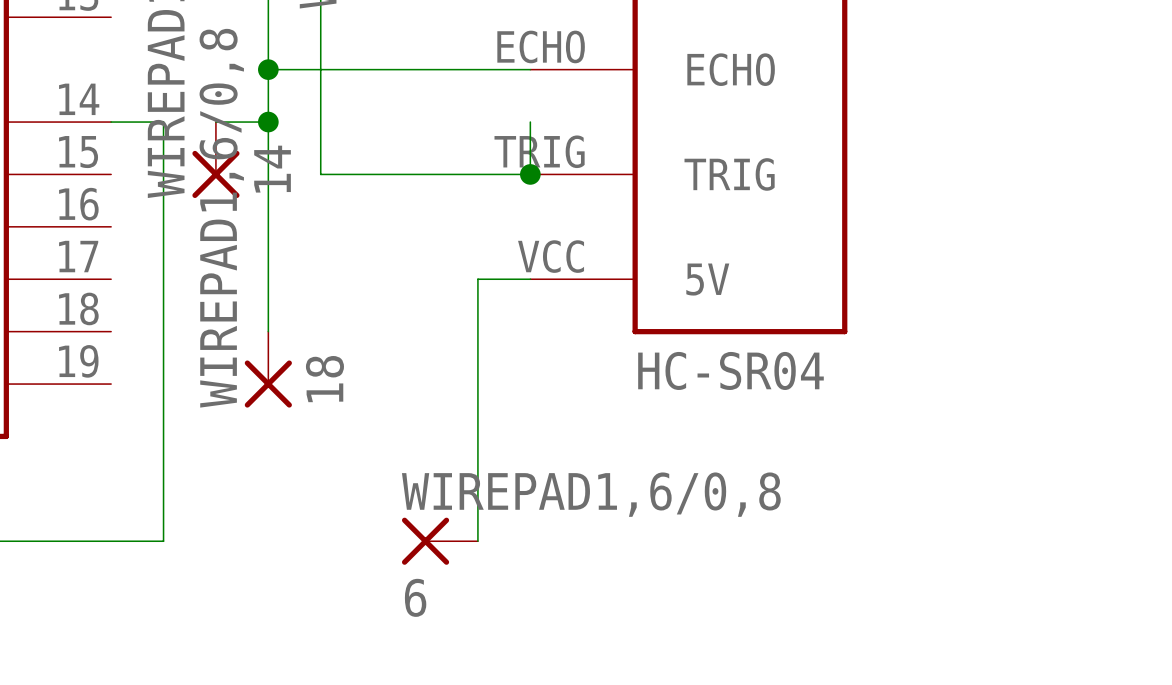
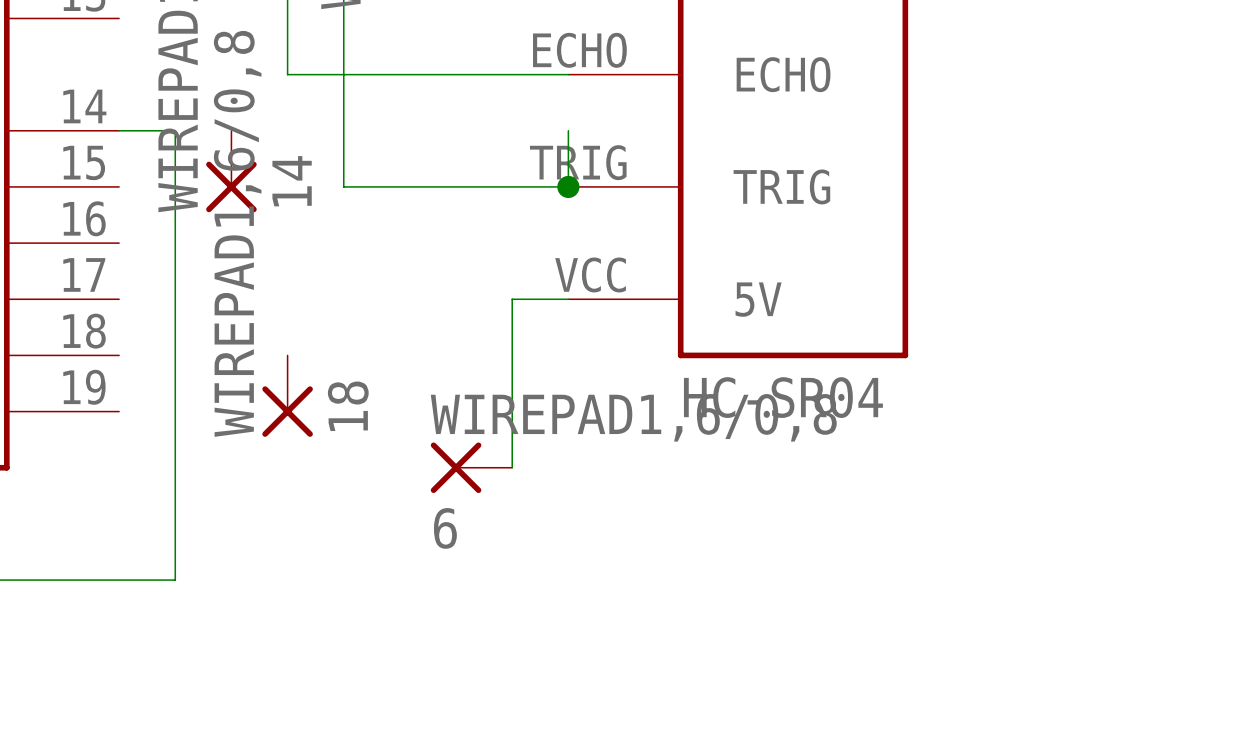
wire: (268, 69) (268, 331) -> none
junction: (268, 69) -> none
wire: (215, 122) (268, 122) -> none
junction: (268, 122) -> none
wire: (477, 436) (477, 541) -> none
6 position: (439, 541) -> (471, 467)

